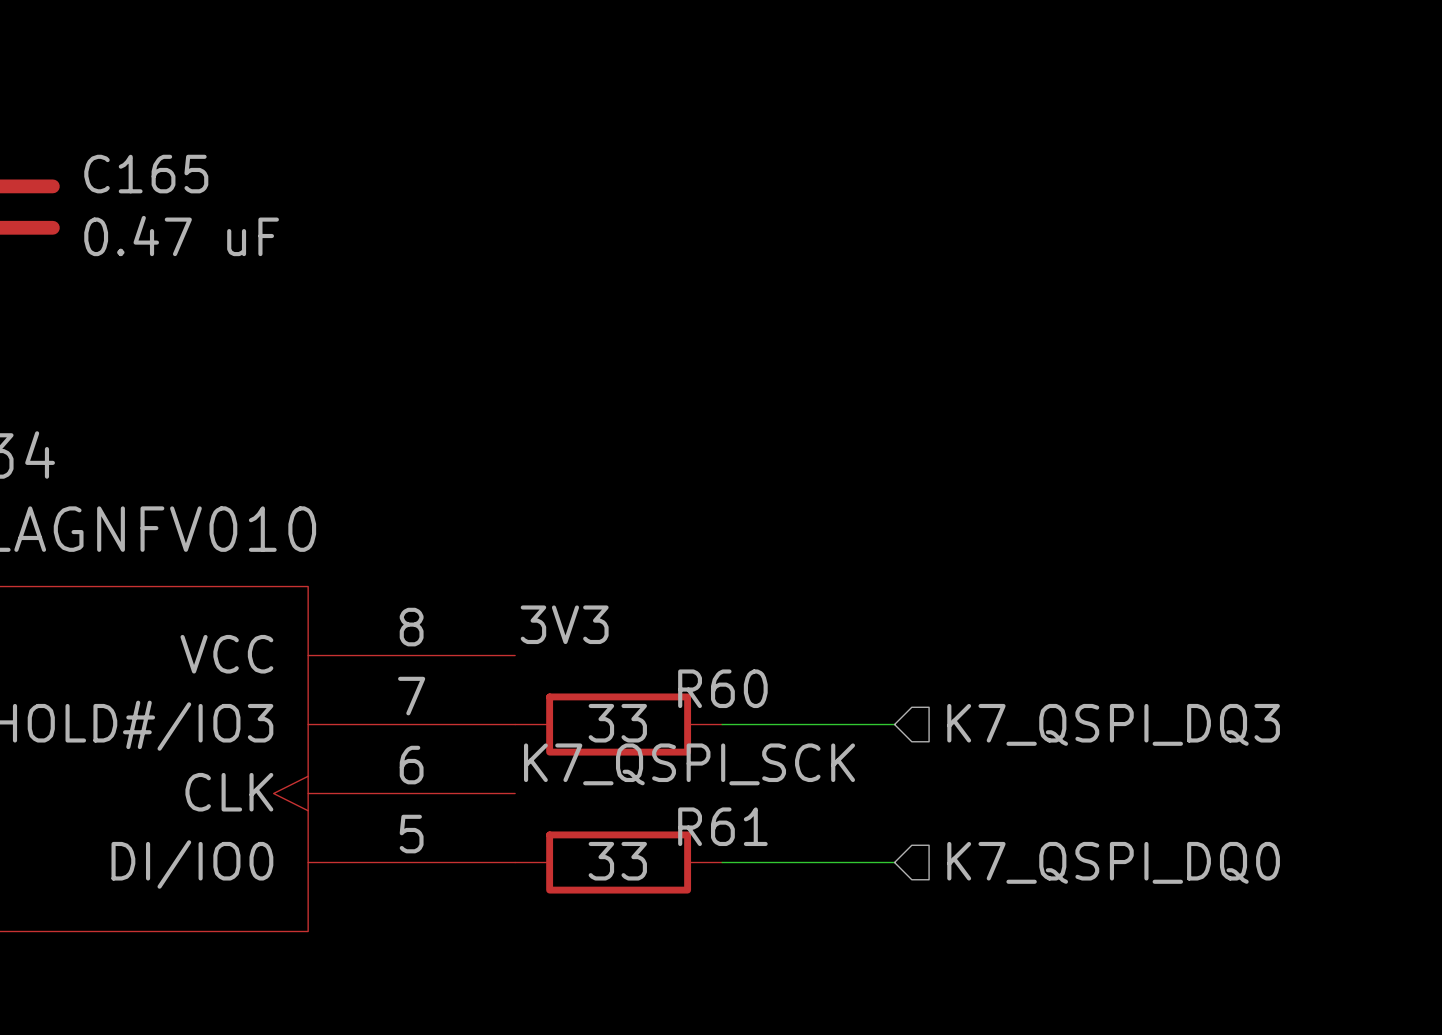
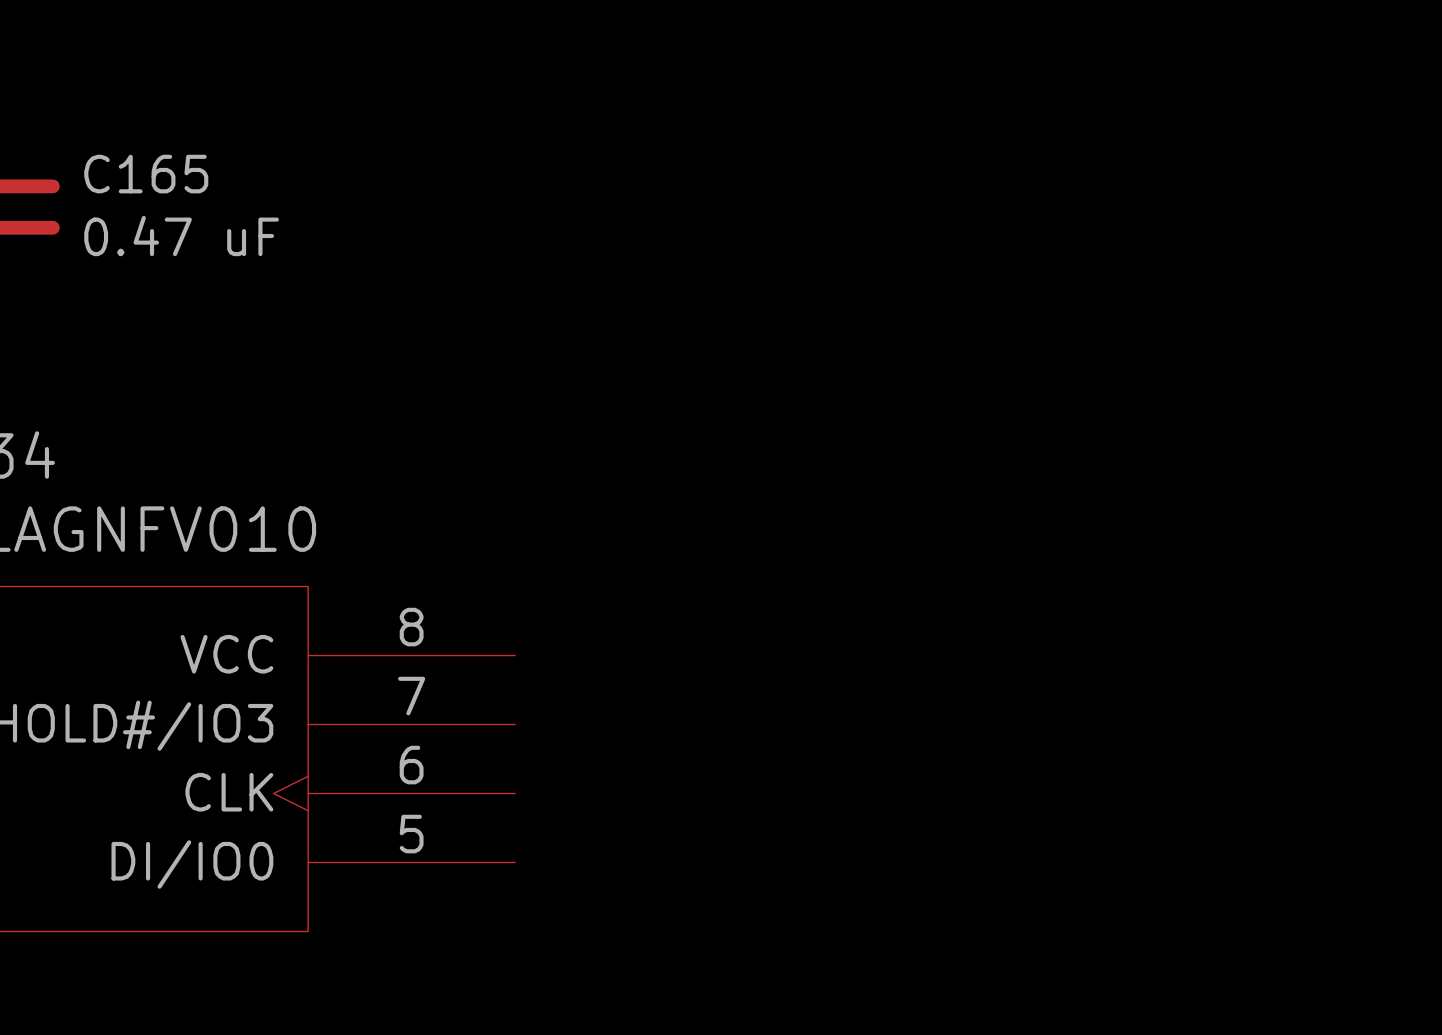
label: 3V3 (564, 624) -> none
R60: 33 (618, 724) -> none
wire: (722, 724) (894, 724) -> none
hierarchical label: K7_QSPI_DQ3 (1113, 724) -> none
label: K7_QSPI_SCK (689, 764) -> none
R61: 33 (618, 862) -> none
wire: (722, 862) (894, 862) -> none
hierarchical label: K7_QSPI_DQ0 (1113, 862) -> none

